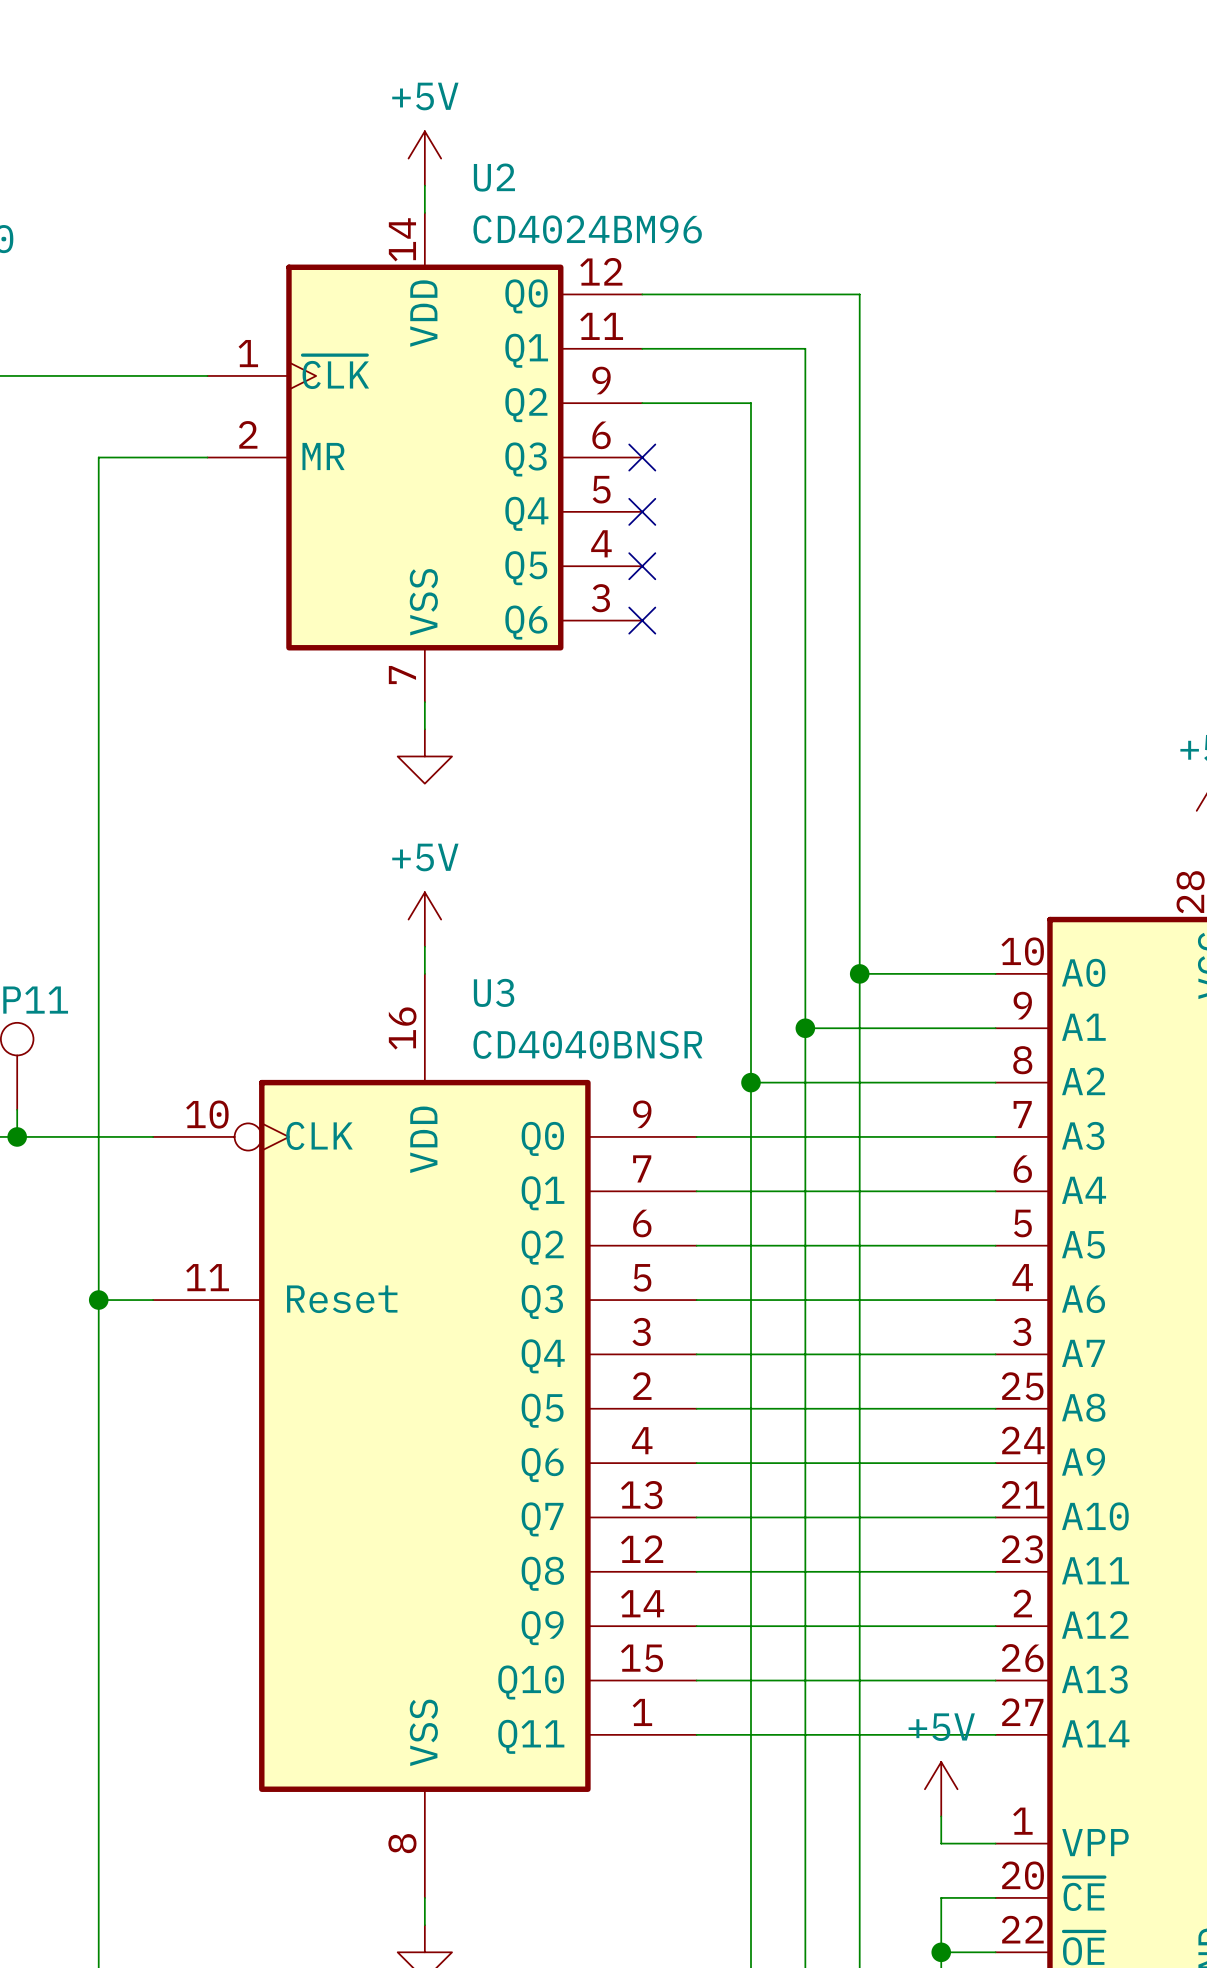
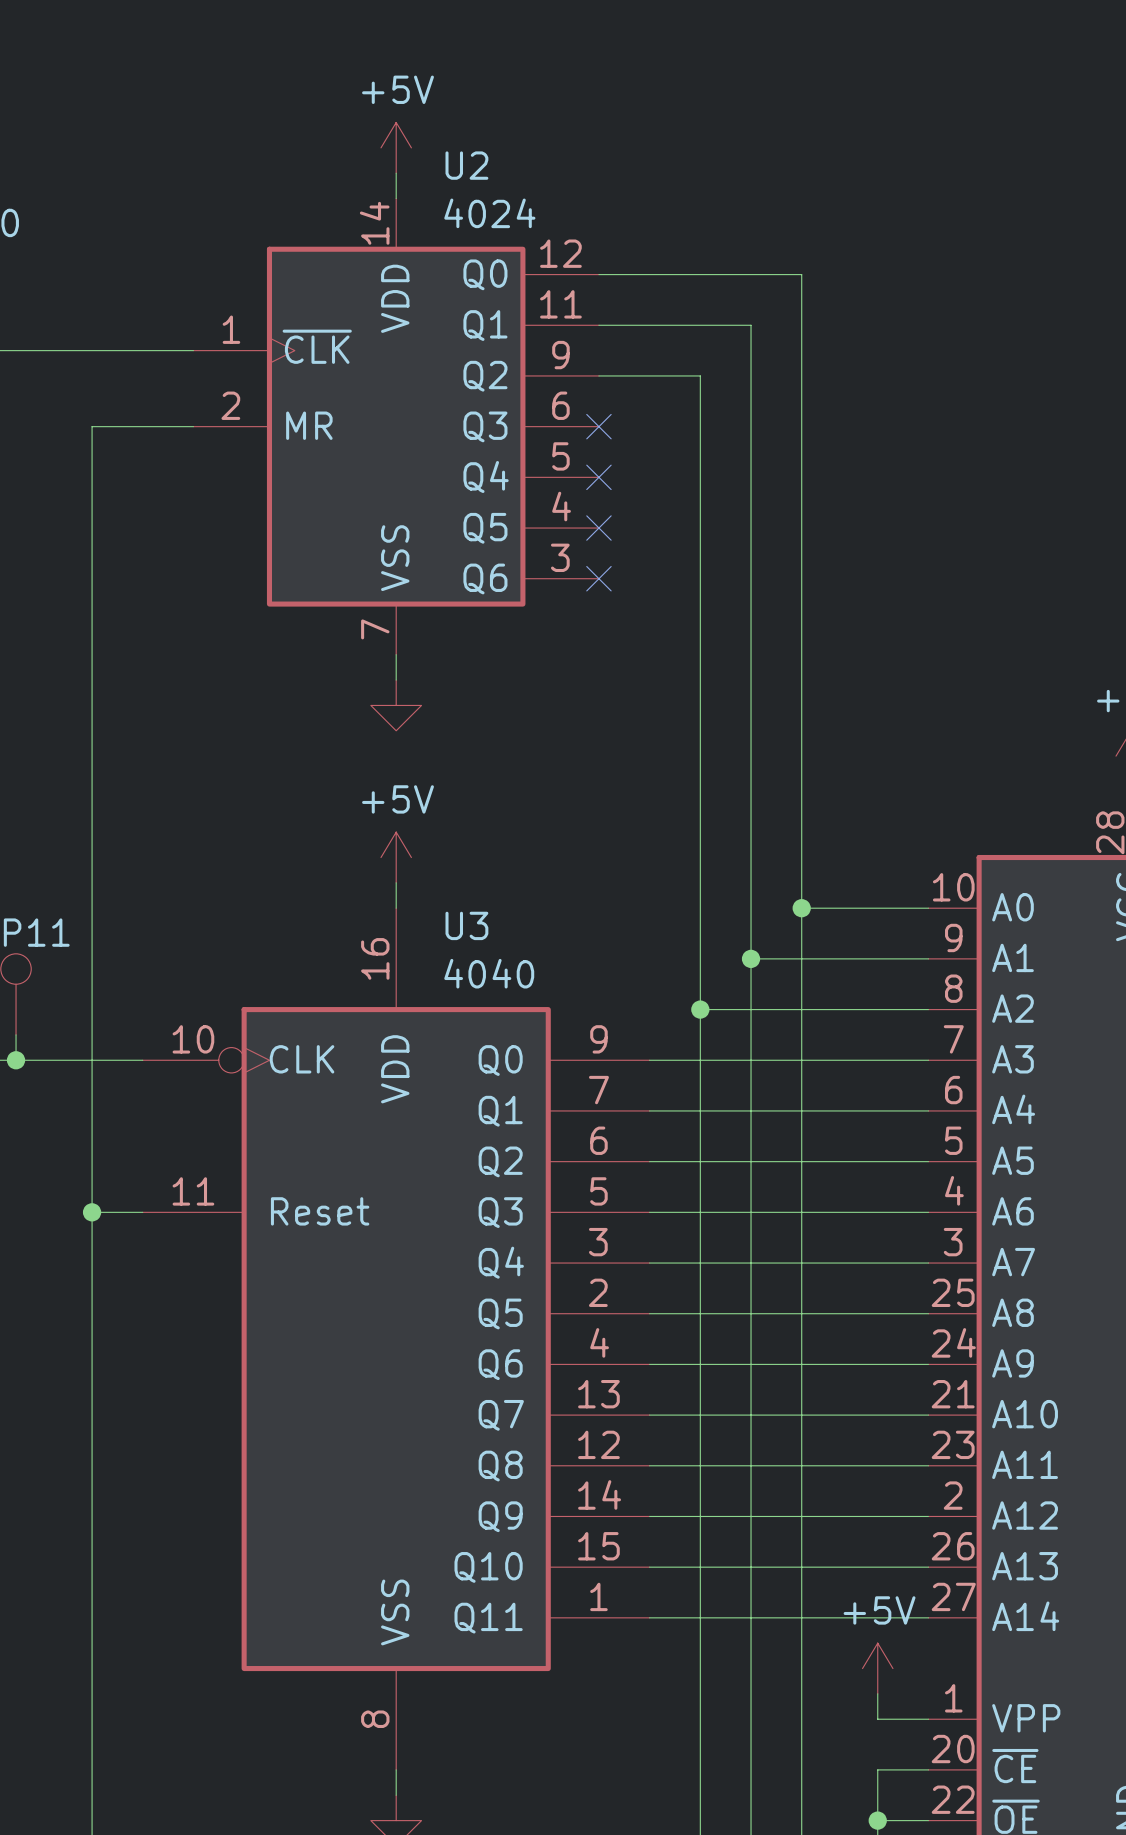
U2 value: CD4024BM96 (587, 229) -> 4024 (489, 213)
U3 value: CD4040BNSR (587, 1044) -> 4040 (489, 973)

